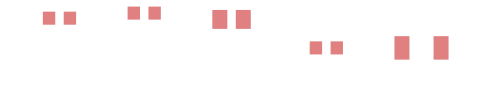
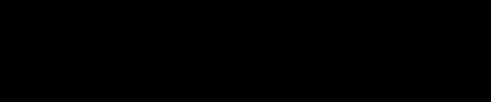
part: (144, 13) -> none
part: (59, 18) -> none
part: (231, 19) -> none
part: (326, 47) -> none
part: (421, 47) -> none

